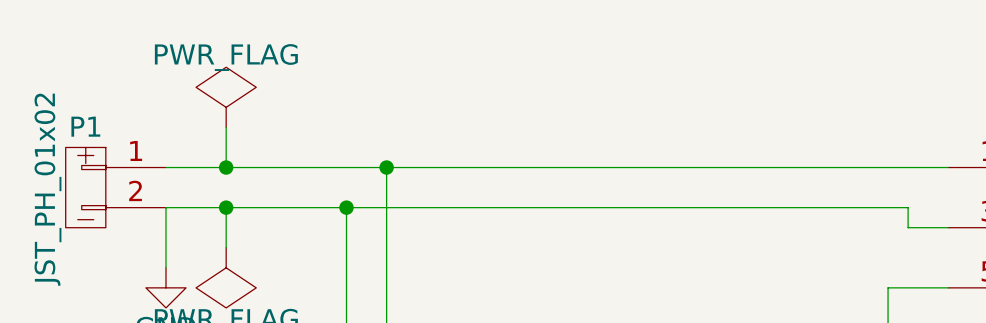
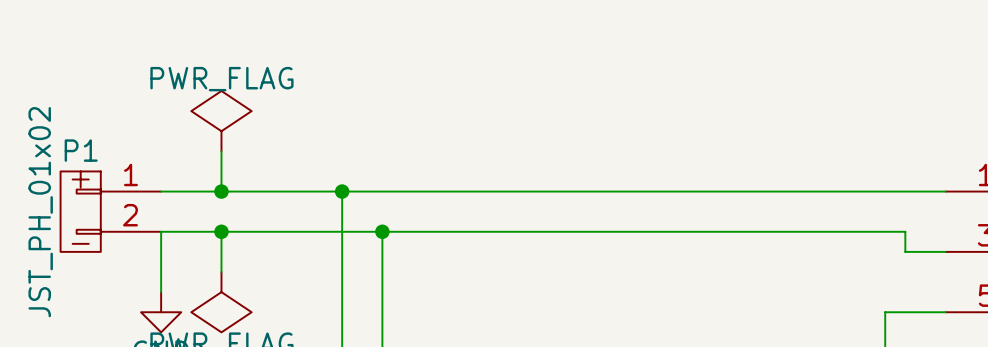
junction: none -> (342, 191)
wire: (386, 167) (386, 207) -> (342, 191) (342, 231)
junction: (386, 167) -> none
junction: (346, 207) -> none
junction: none -> (382, 231)

